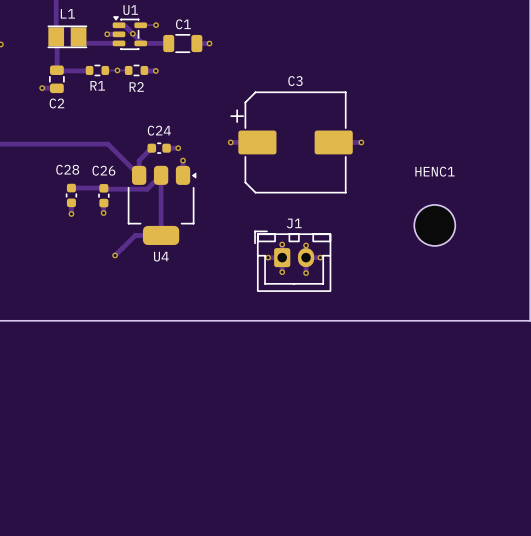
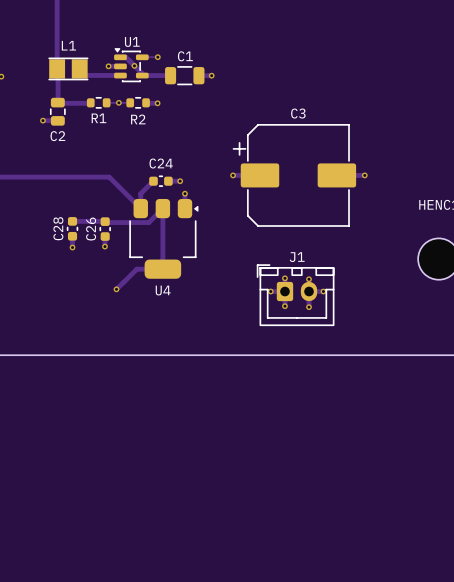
C28 name rotation: 0° (67, 169) -> 90° counterclockwise (58, 228)
C26 name rotation: 0° (103, 170) -> 90° counterclockwise (91, 229)

